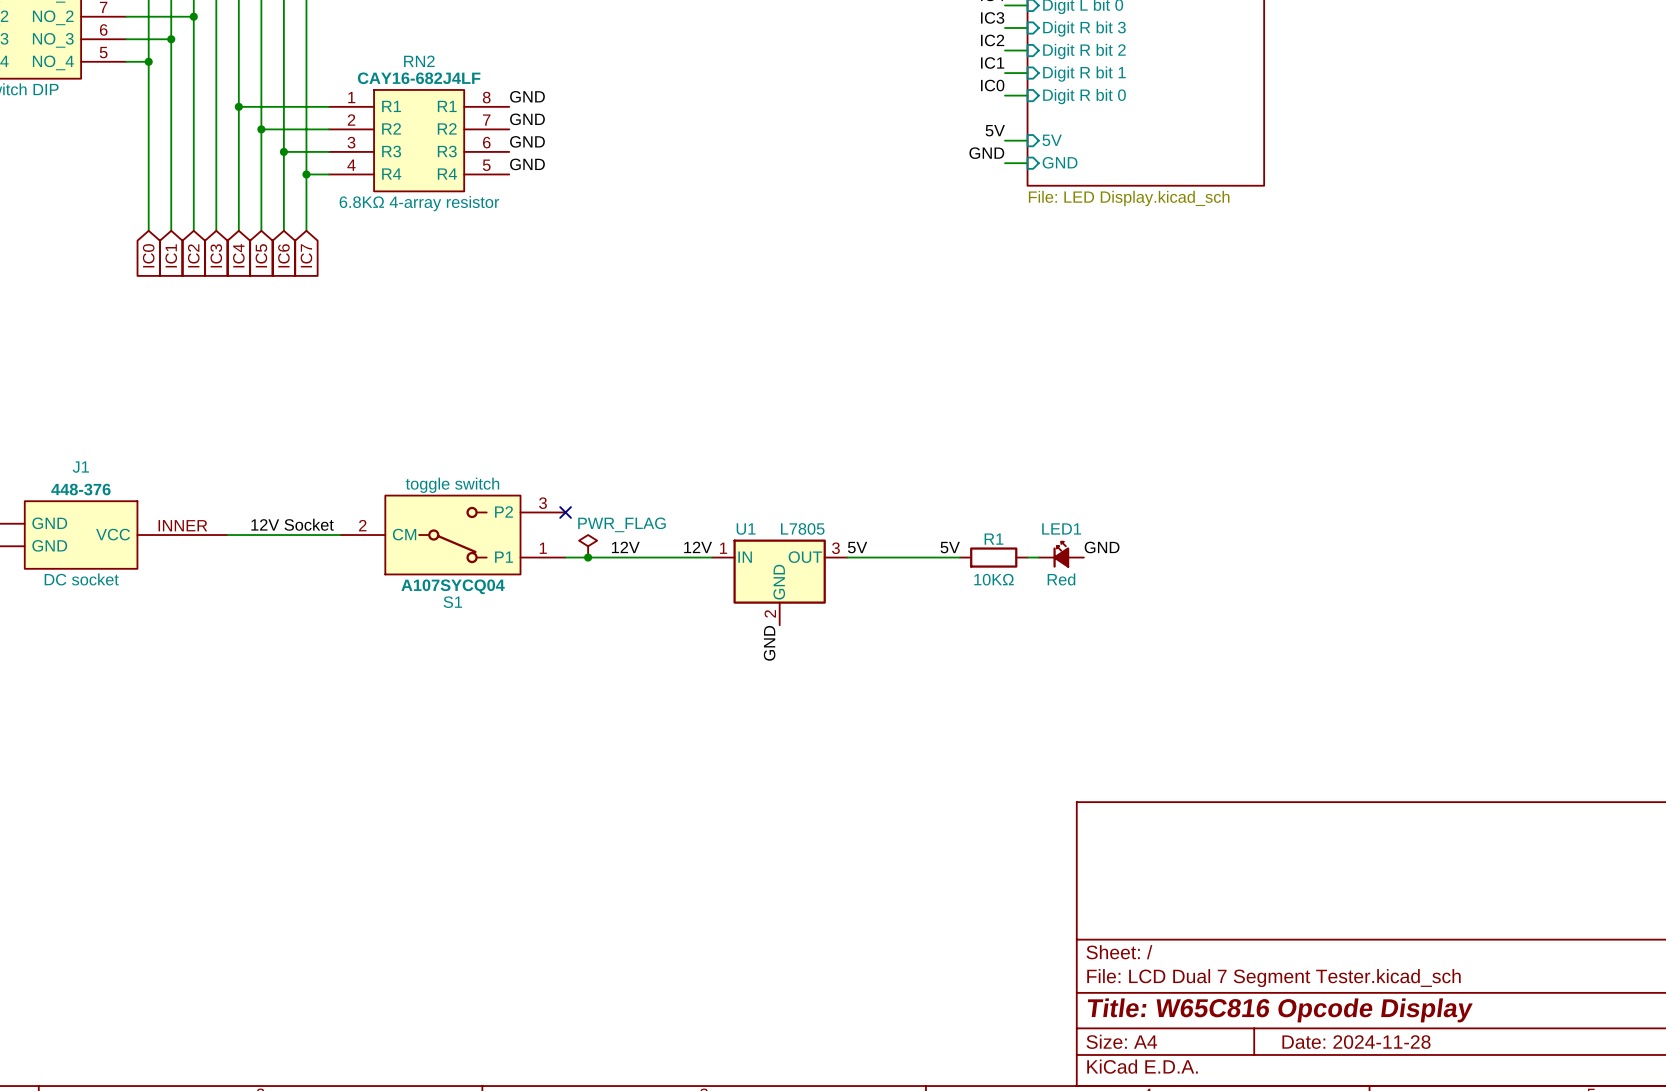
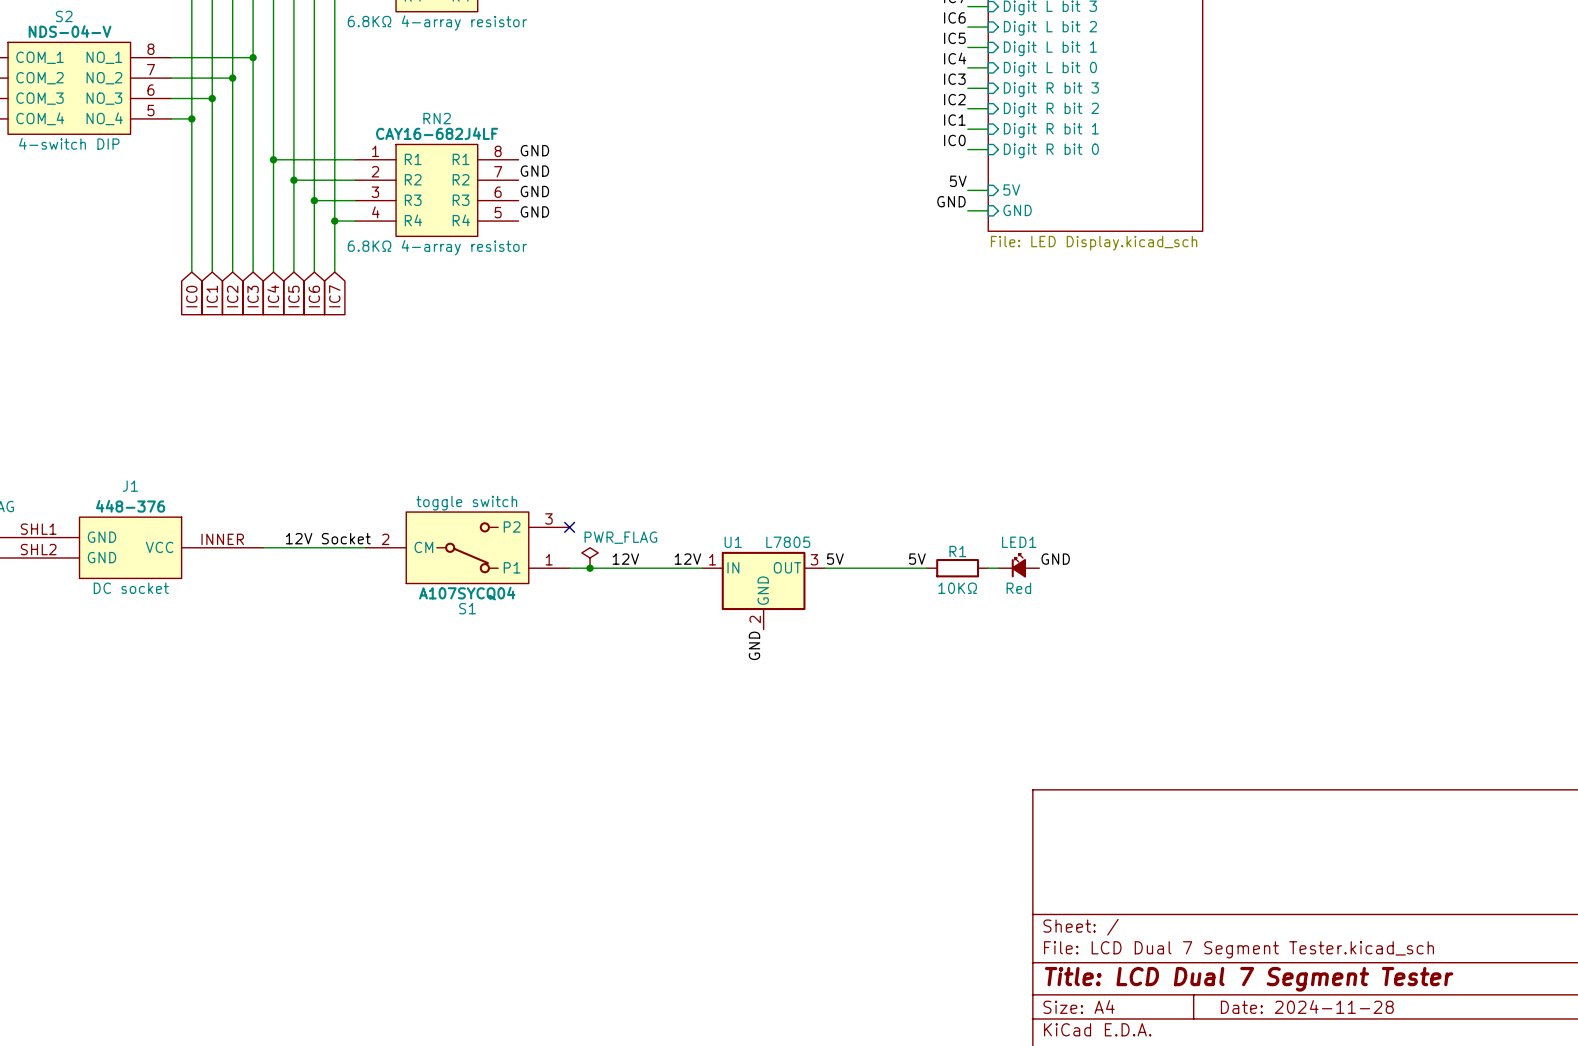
title block: Title: W65C816 Opcode Display (1280, 1010) -> Title: LCD Dual 7 Segment Tester (1249, 979)

